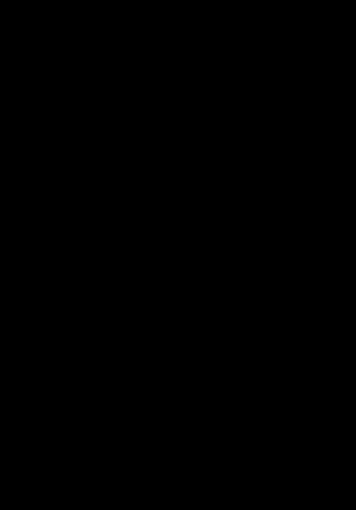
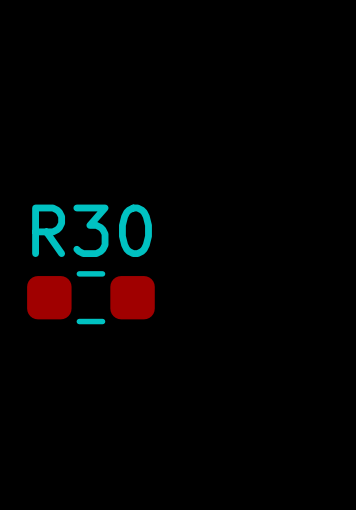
R30: none -> (90, 297)

